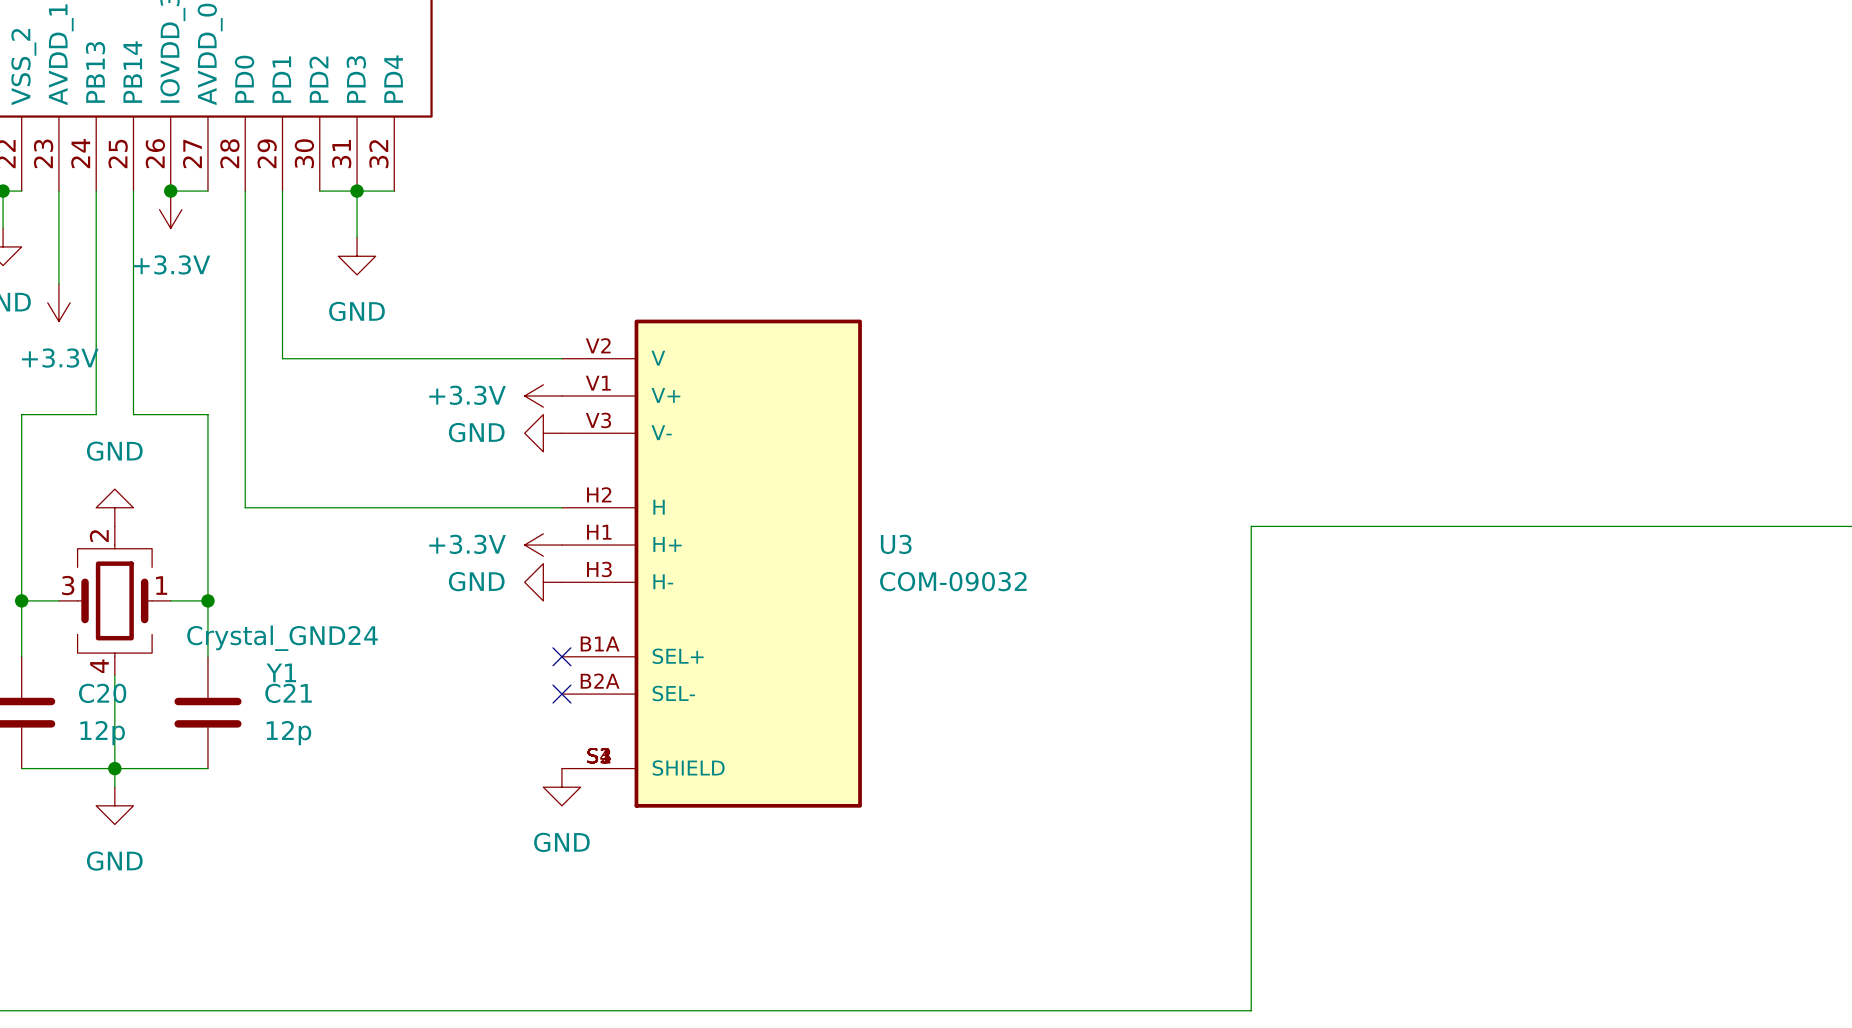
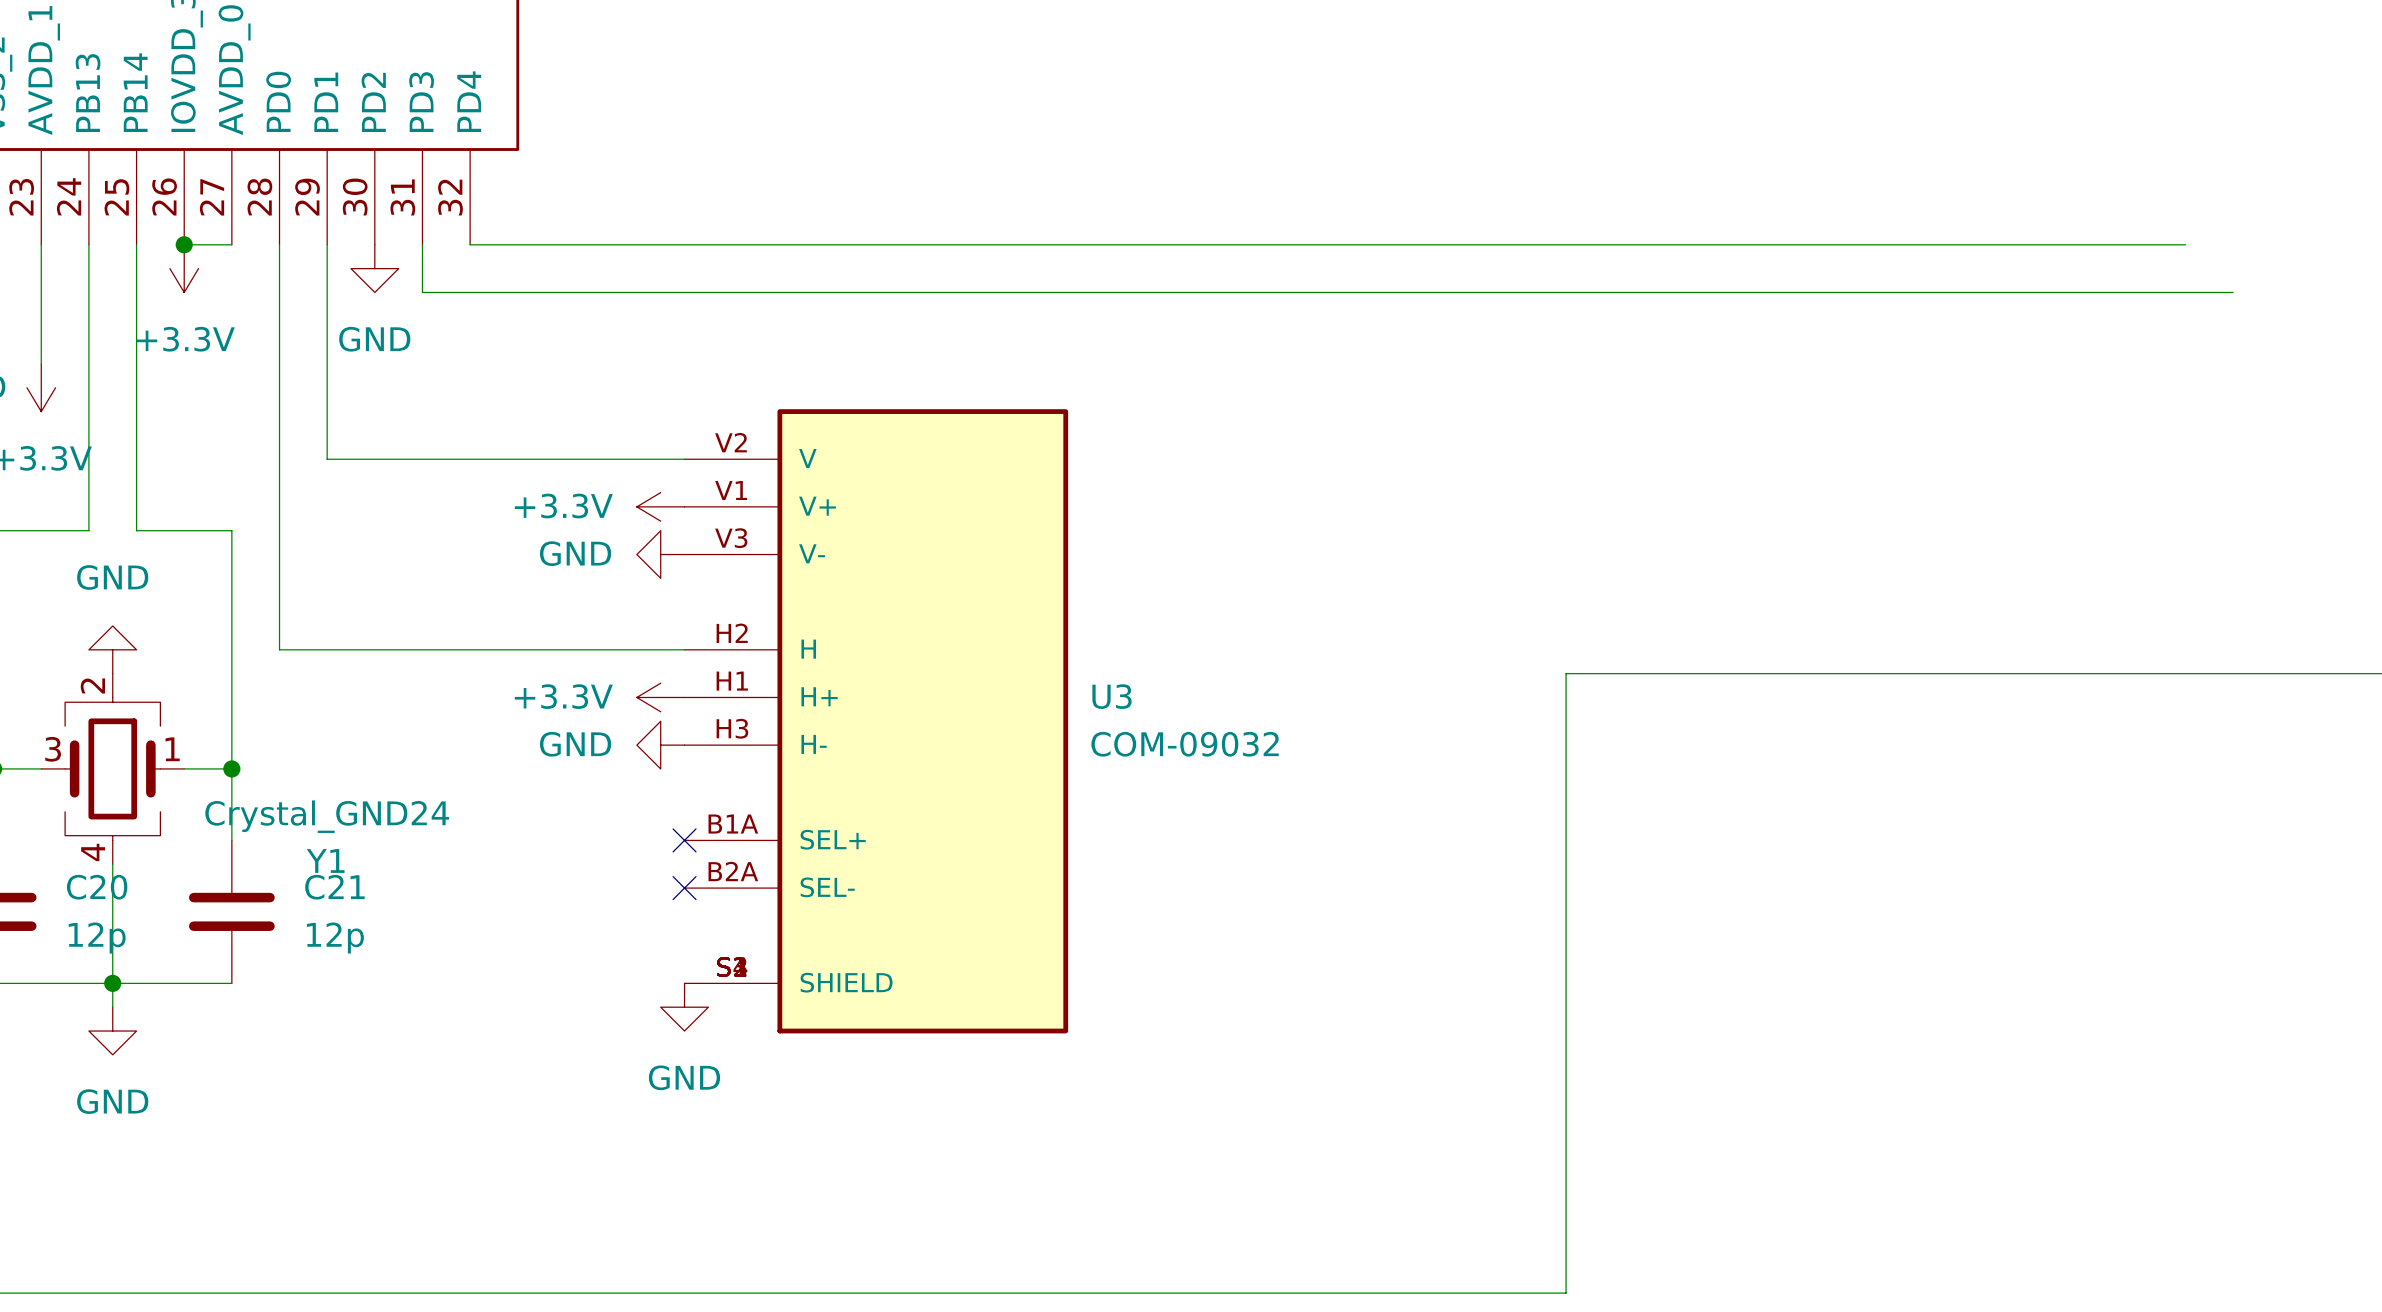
wire: (319, 191) (394, 191) -> (2185, 244) (470, 244)
junction: (357, 191) -> none
wire: (357, 228) (357, 237) -> (422, 292) (2233, 292)
power symbol position: GND (357, 256) -> GND (374, 268)

